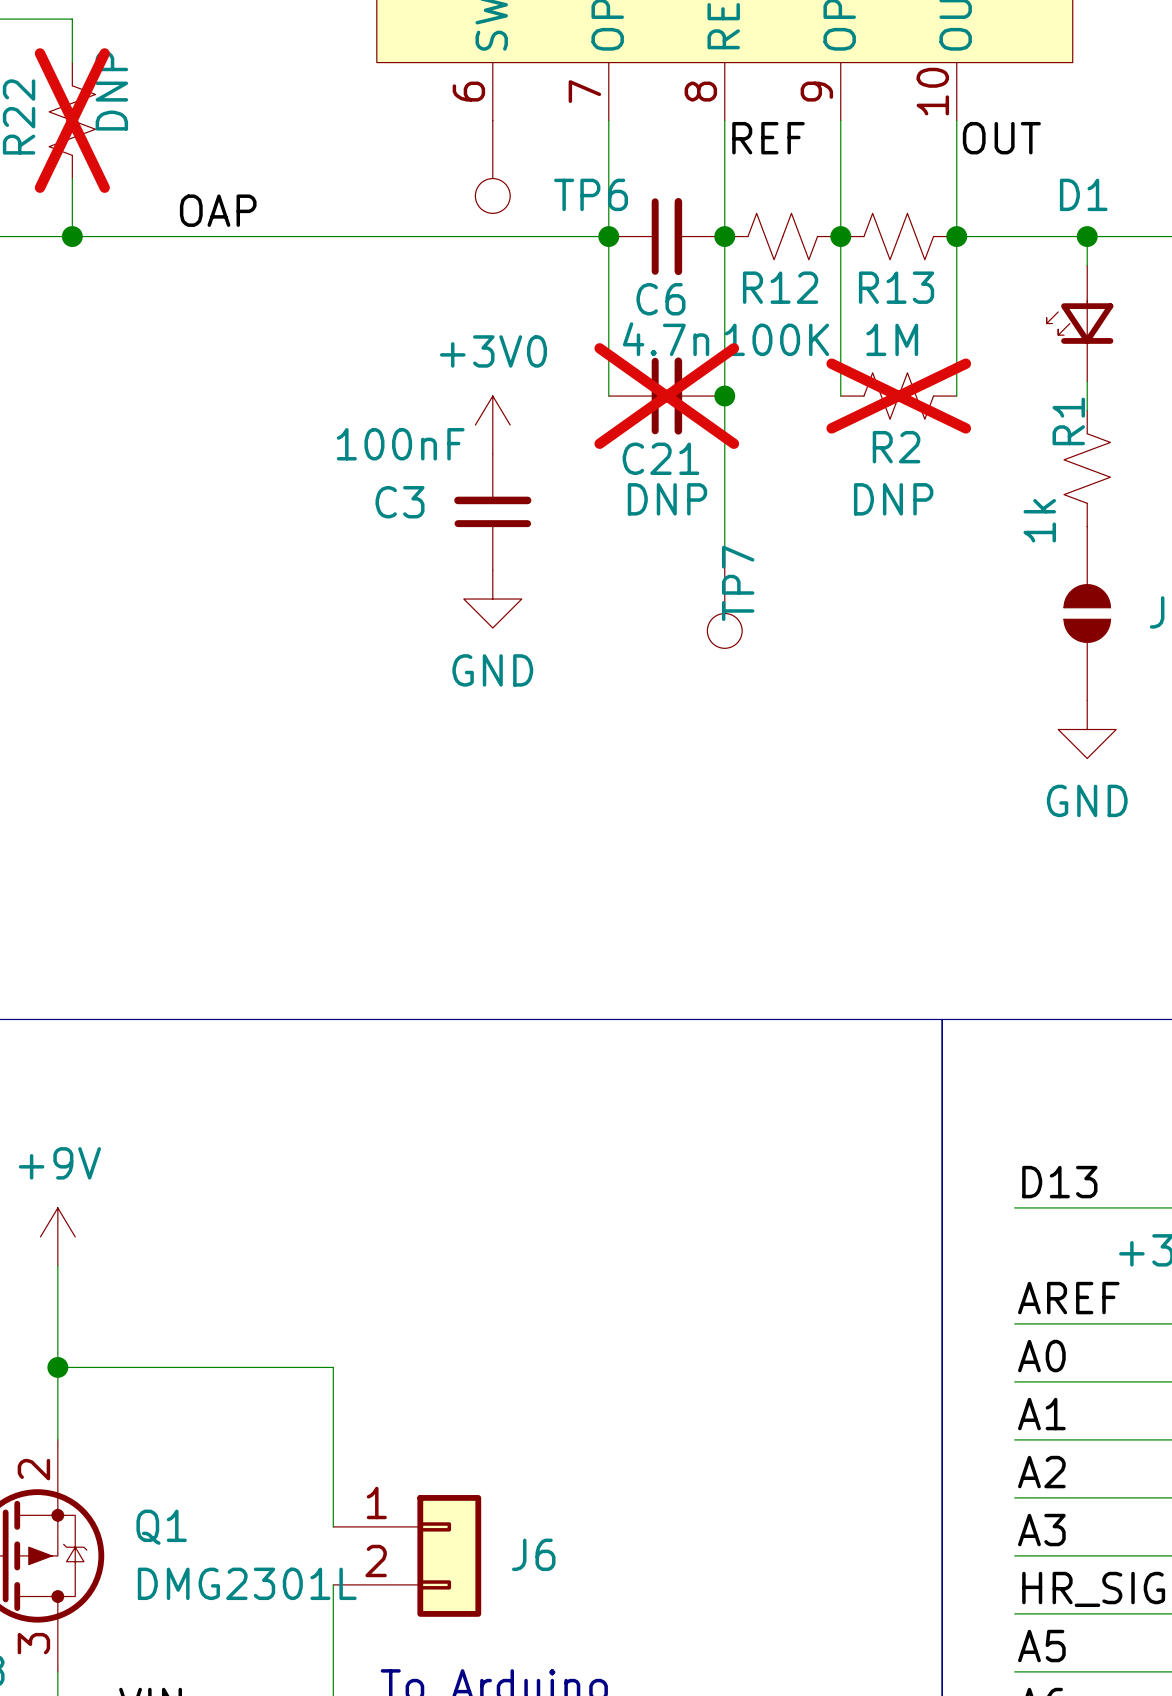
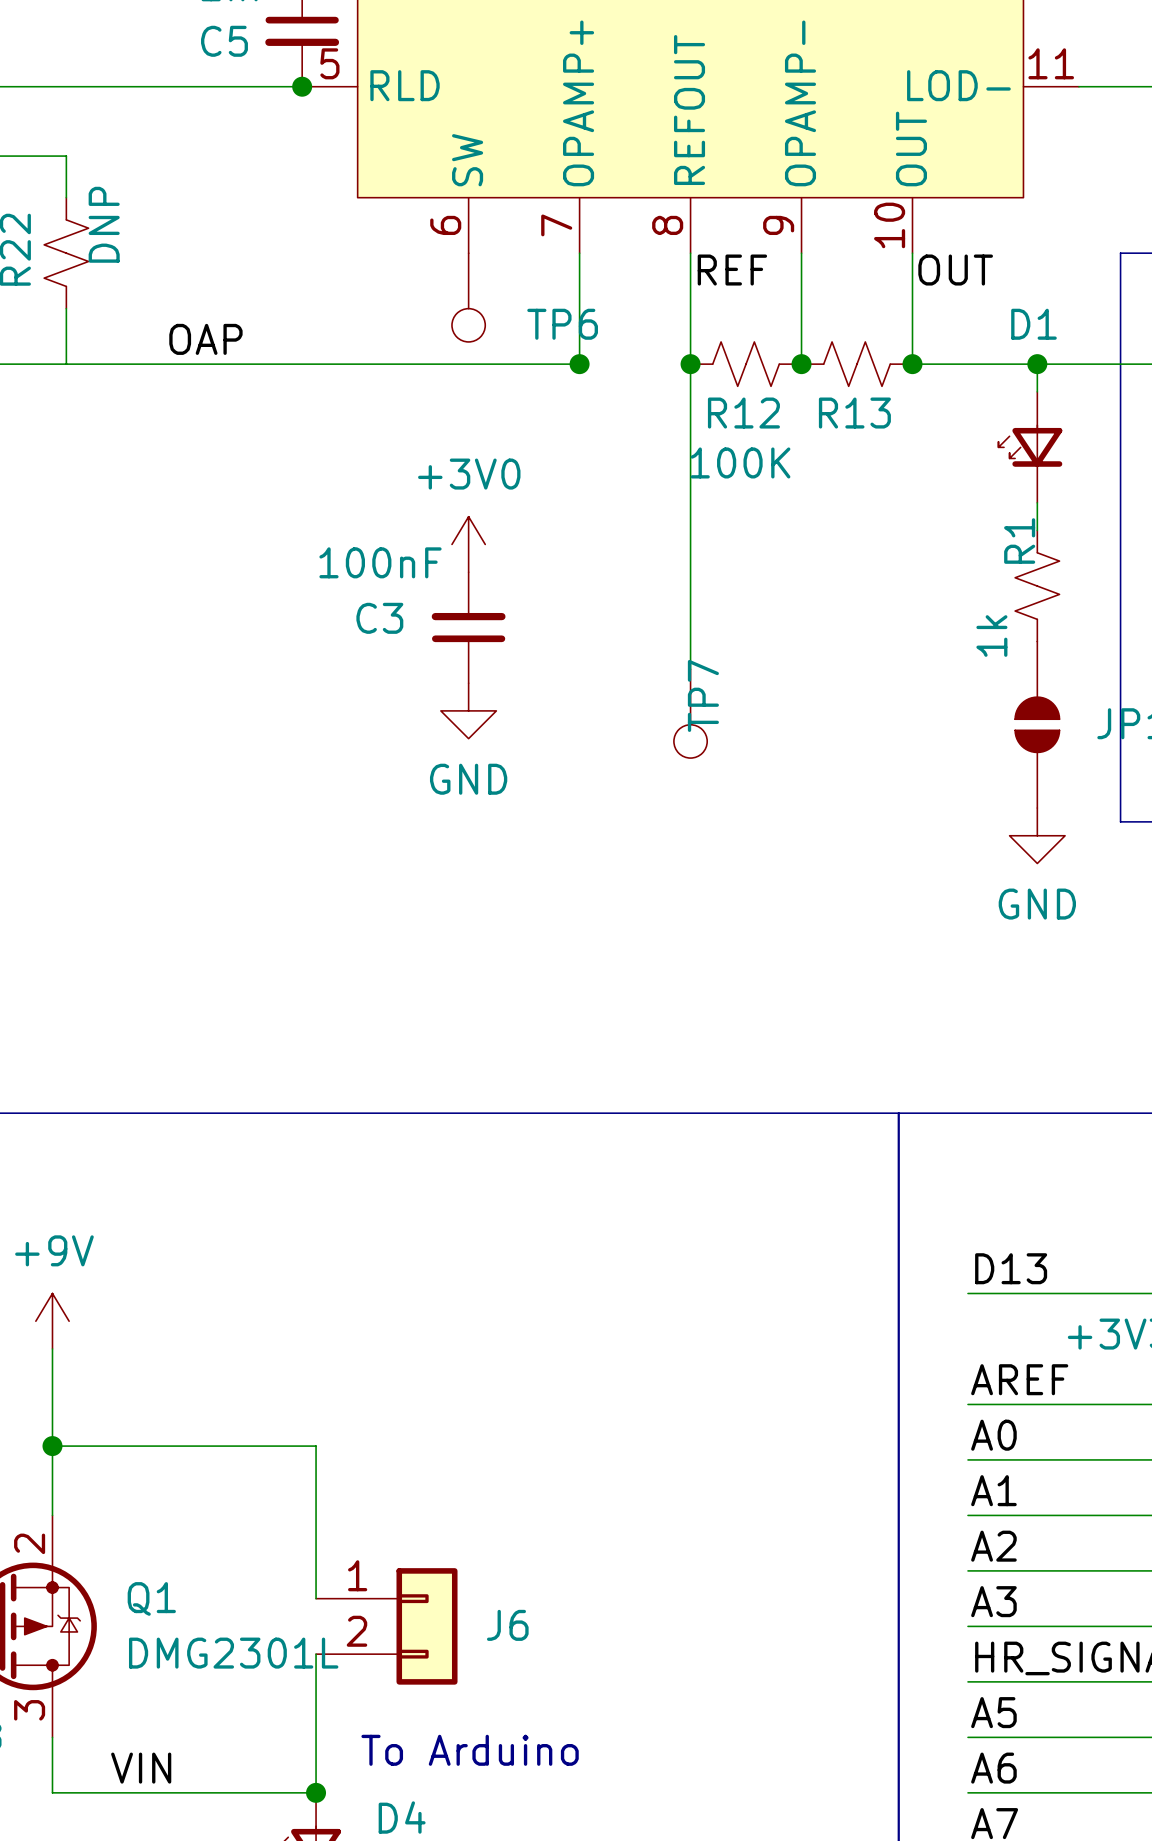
R22 do-not-place cross: (72, 120) -> none
junction: (72, 236) -> none
wire: (608, 236) (608, 396) -> none
C6: 4.7n (666, 236) -> none
wire: (840, 236) (840, 396) -> none
wire: (956, 236) (956, 396) -> none
R13 value: 1M (892, 339) -> none
C21: DNP (666, 396) -> none
junction: (724, 396) -> none
R2: DNP (898, 396) -> none

